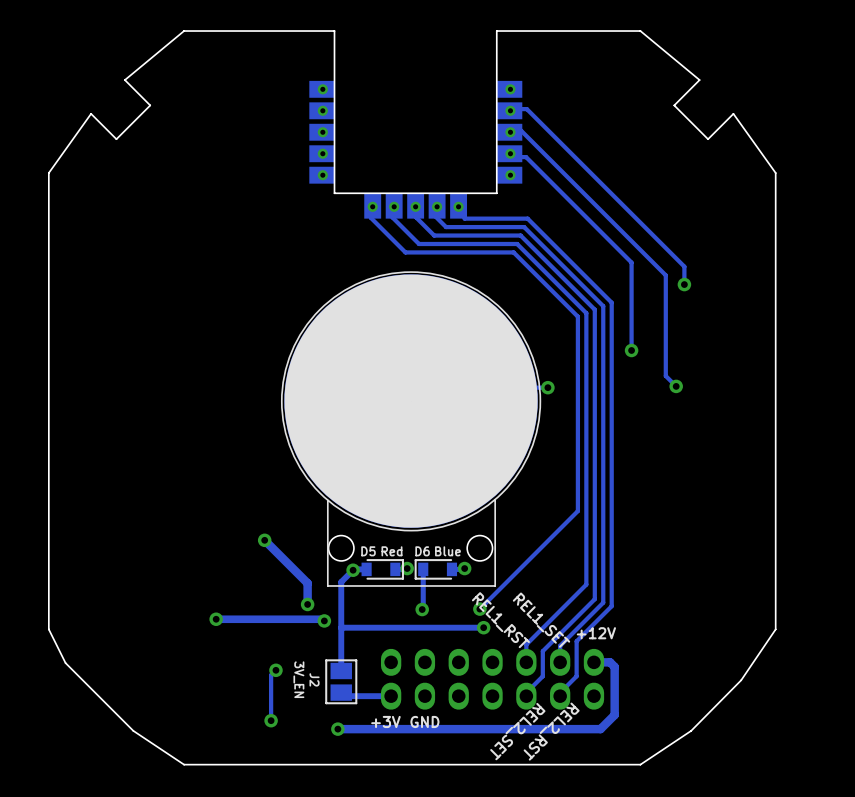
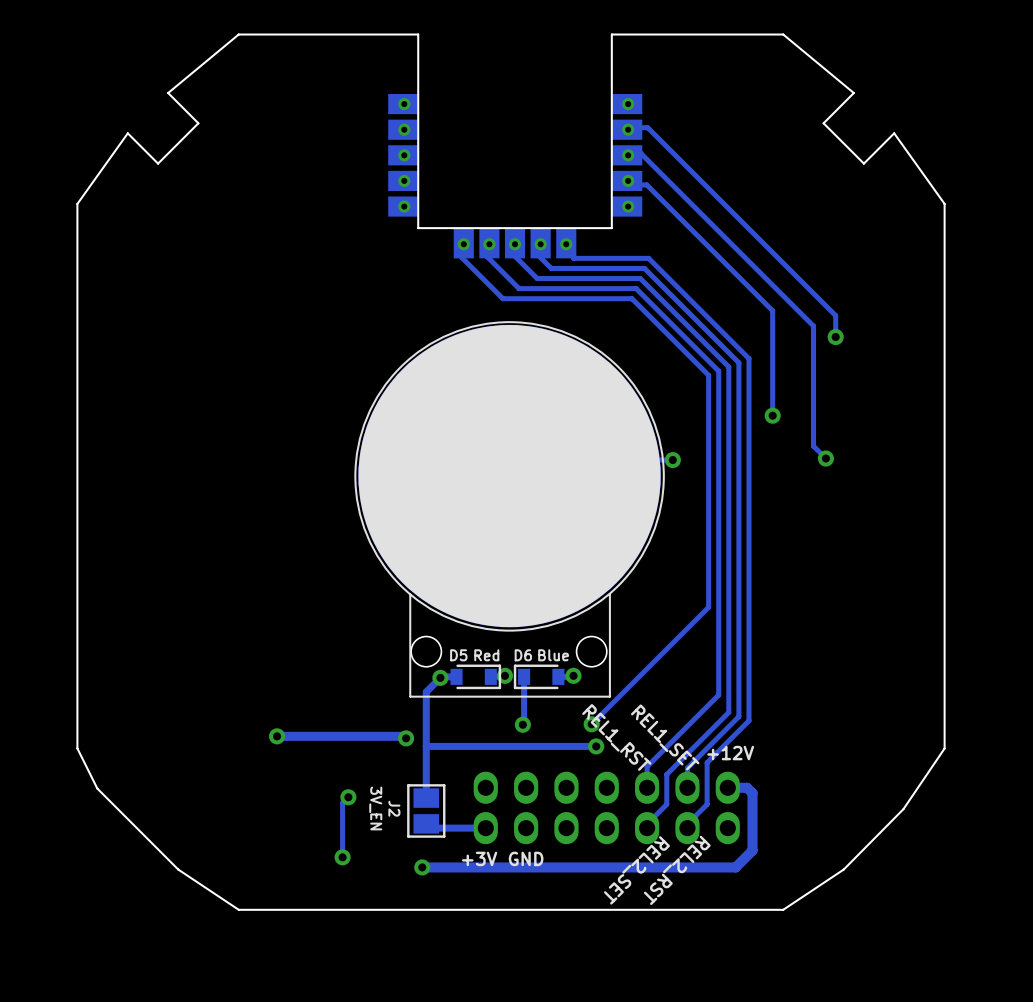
track: (264, 540) (307, 583) (307, 604) -> none
via: (264, 540) -> none
via: (307, 604) -> none

